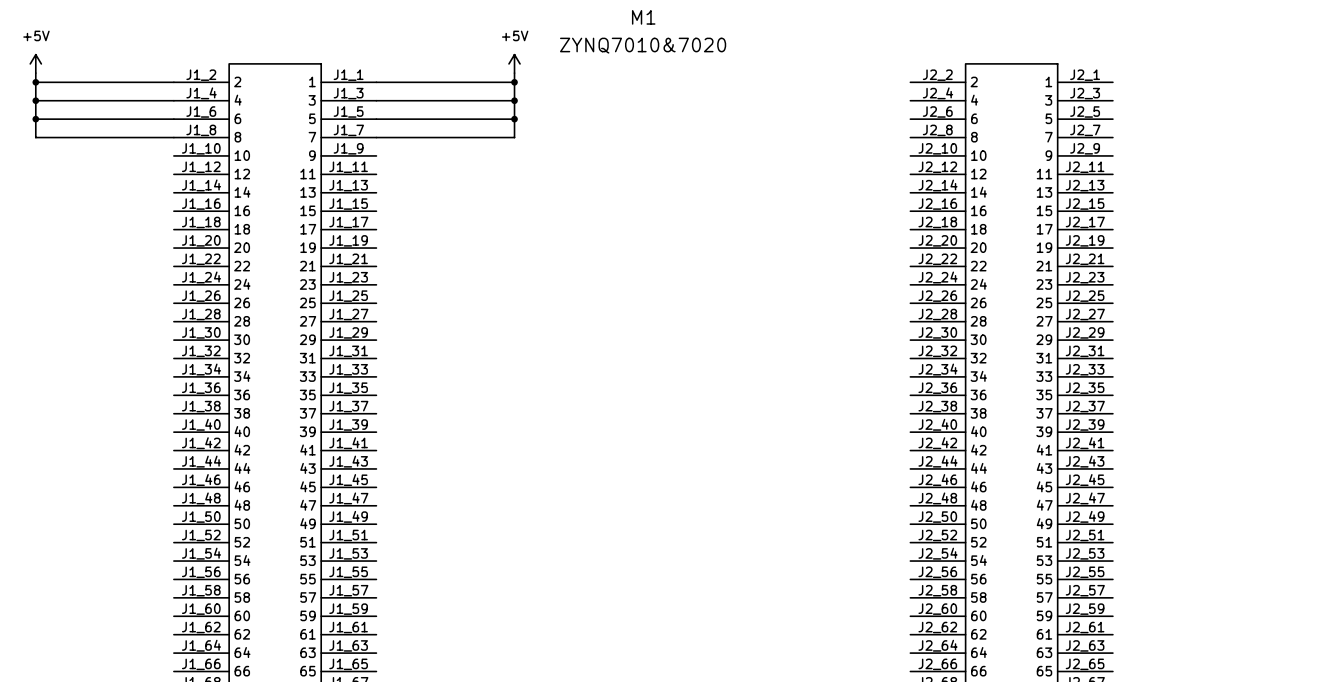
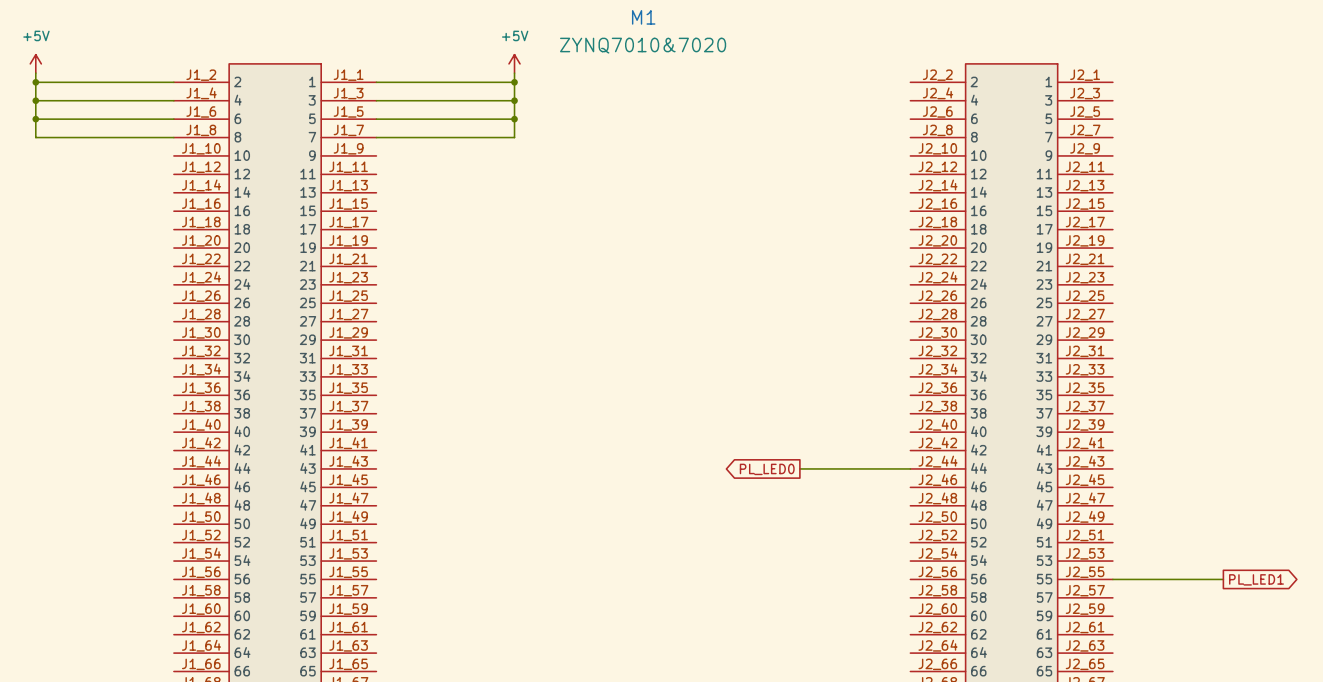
wire: none -> (799, 468) (910, 468)
global label: none -> PL_LED0 (767, 469)
wire: none -> (1112, 579) (1223, 579)
global label: none -> PL_LED1 (1256, 579)

